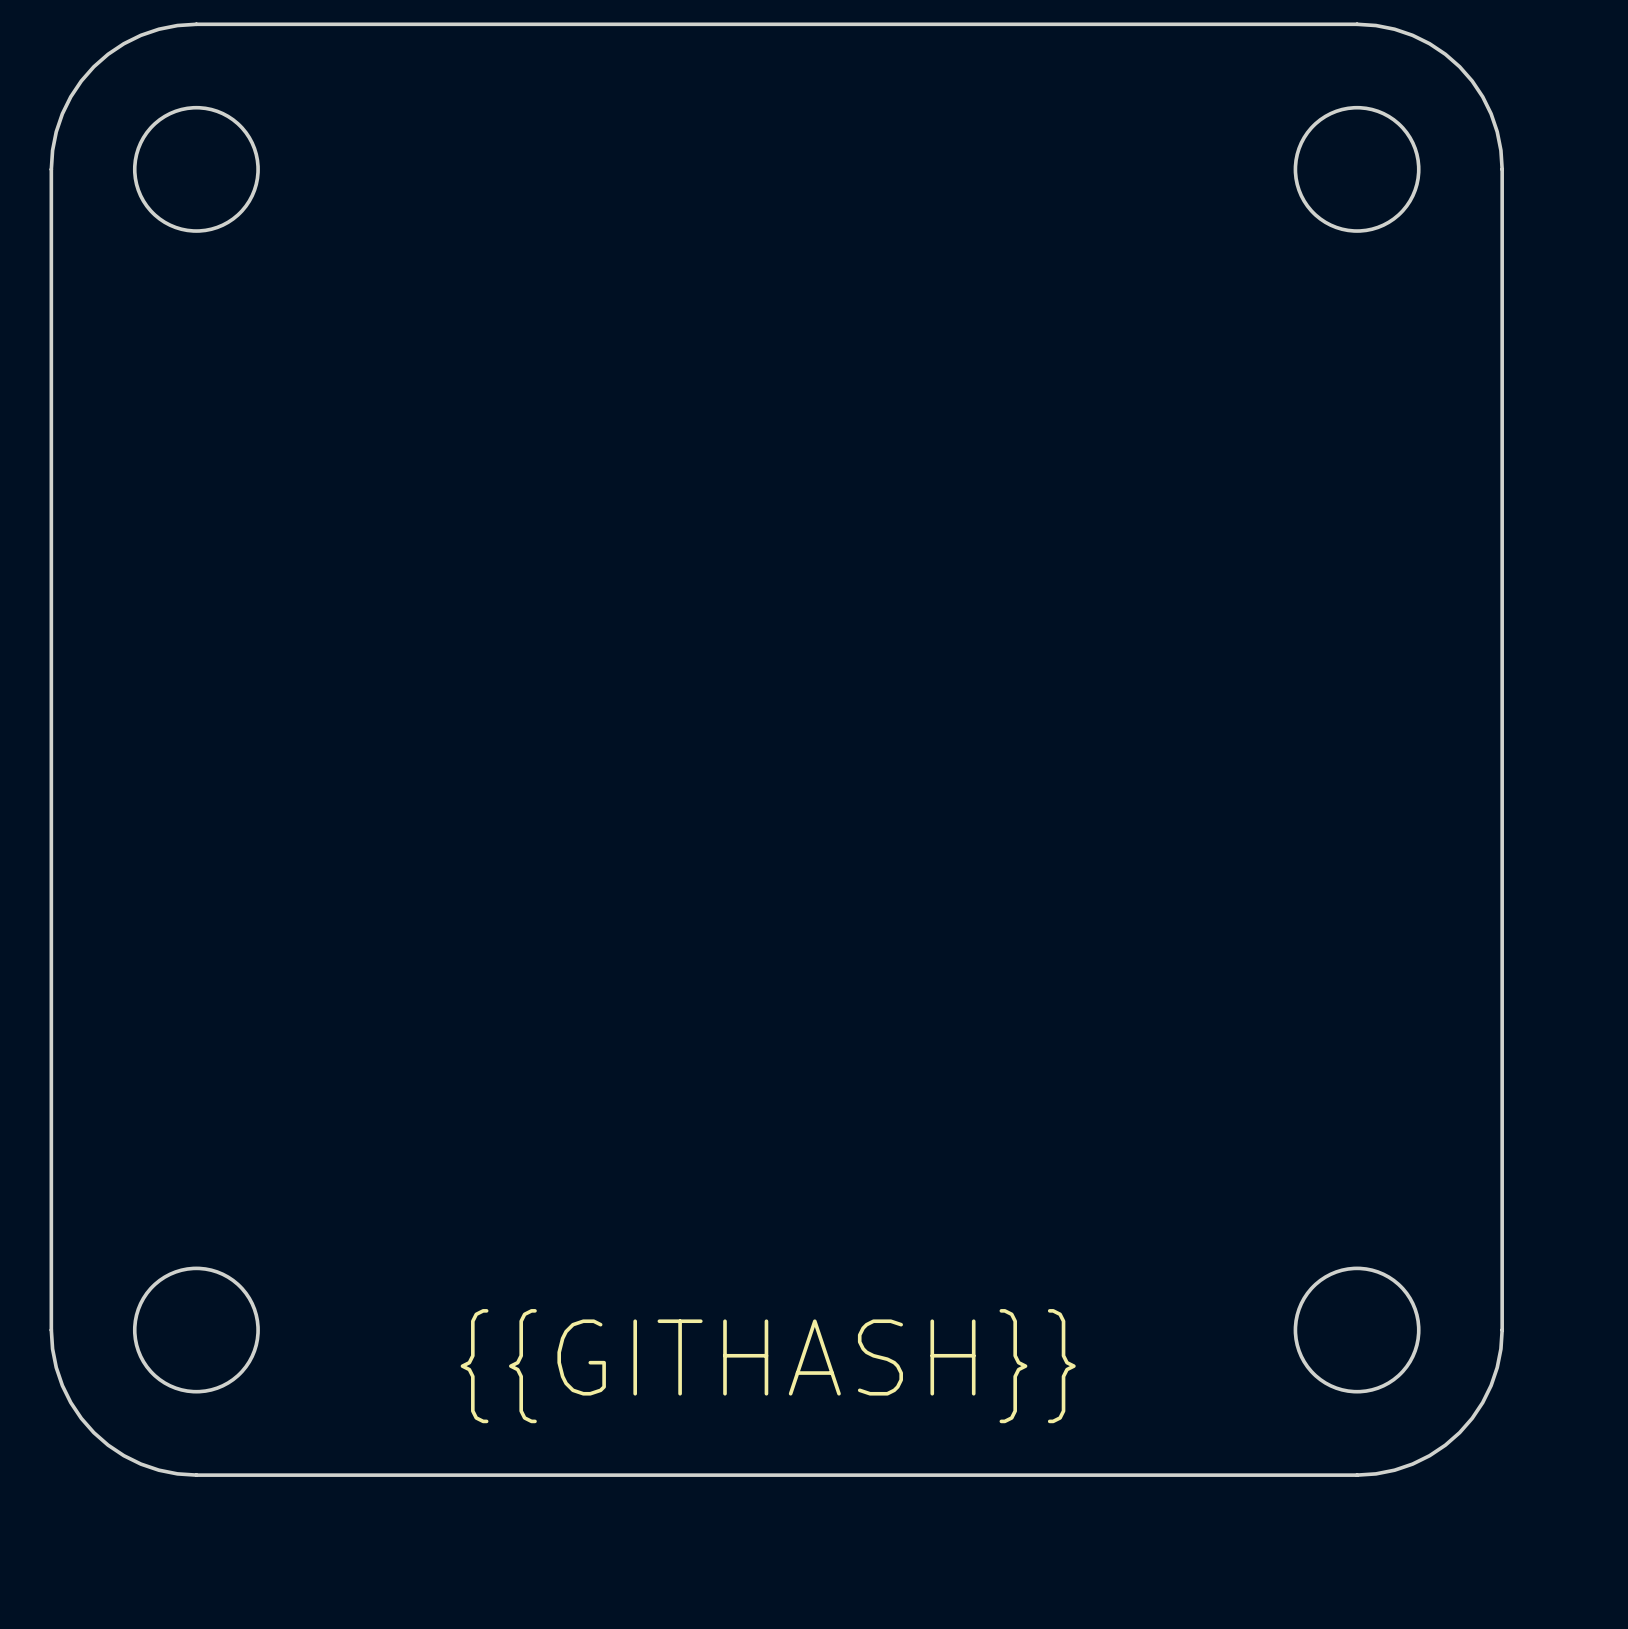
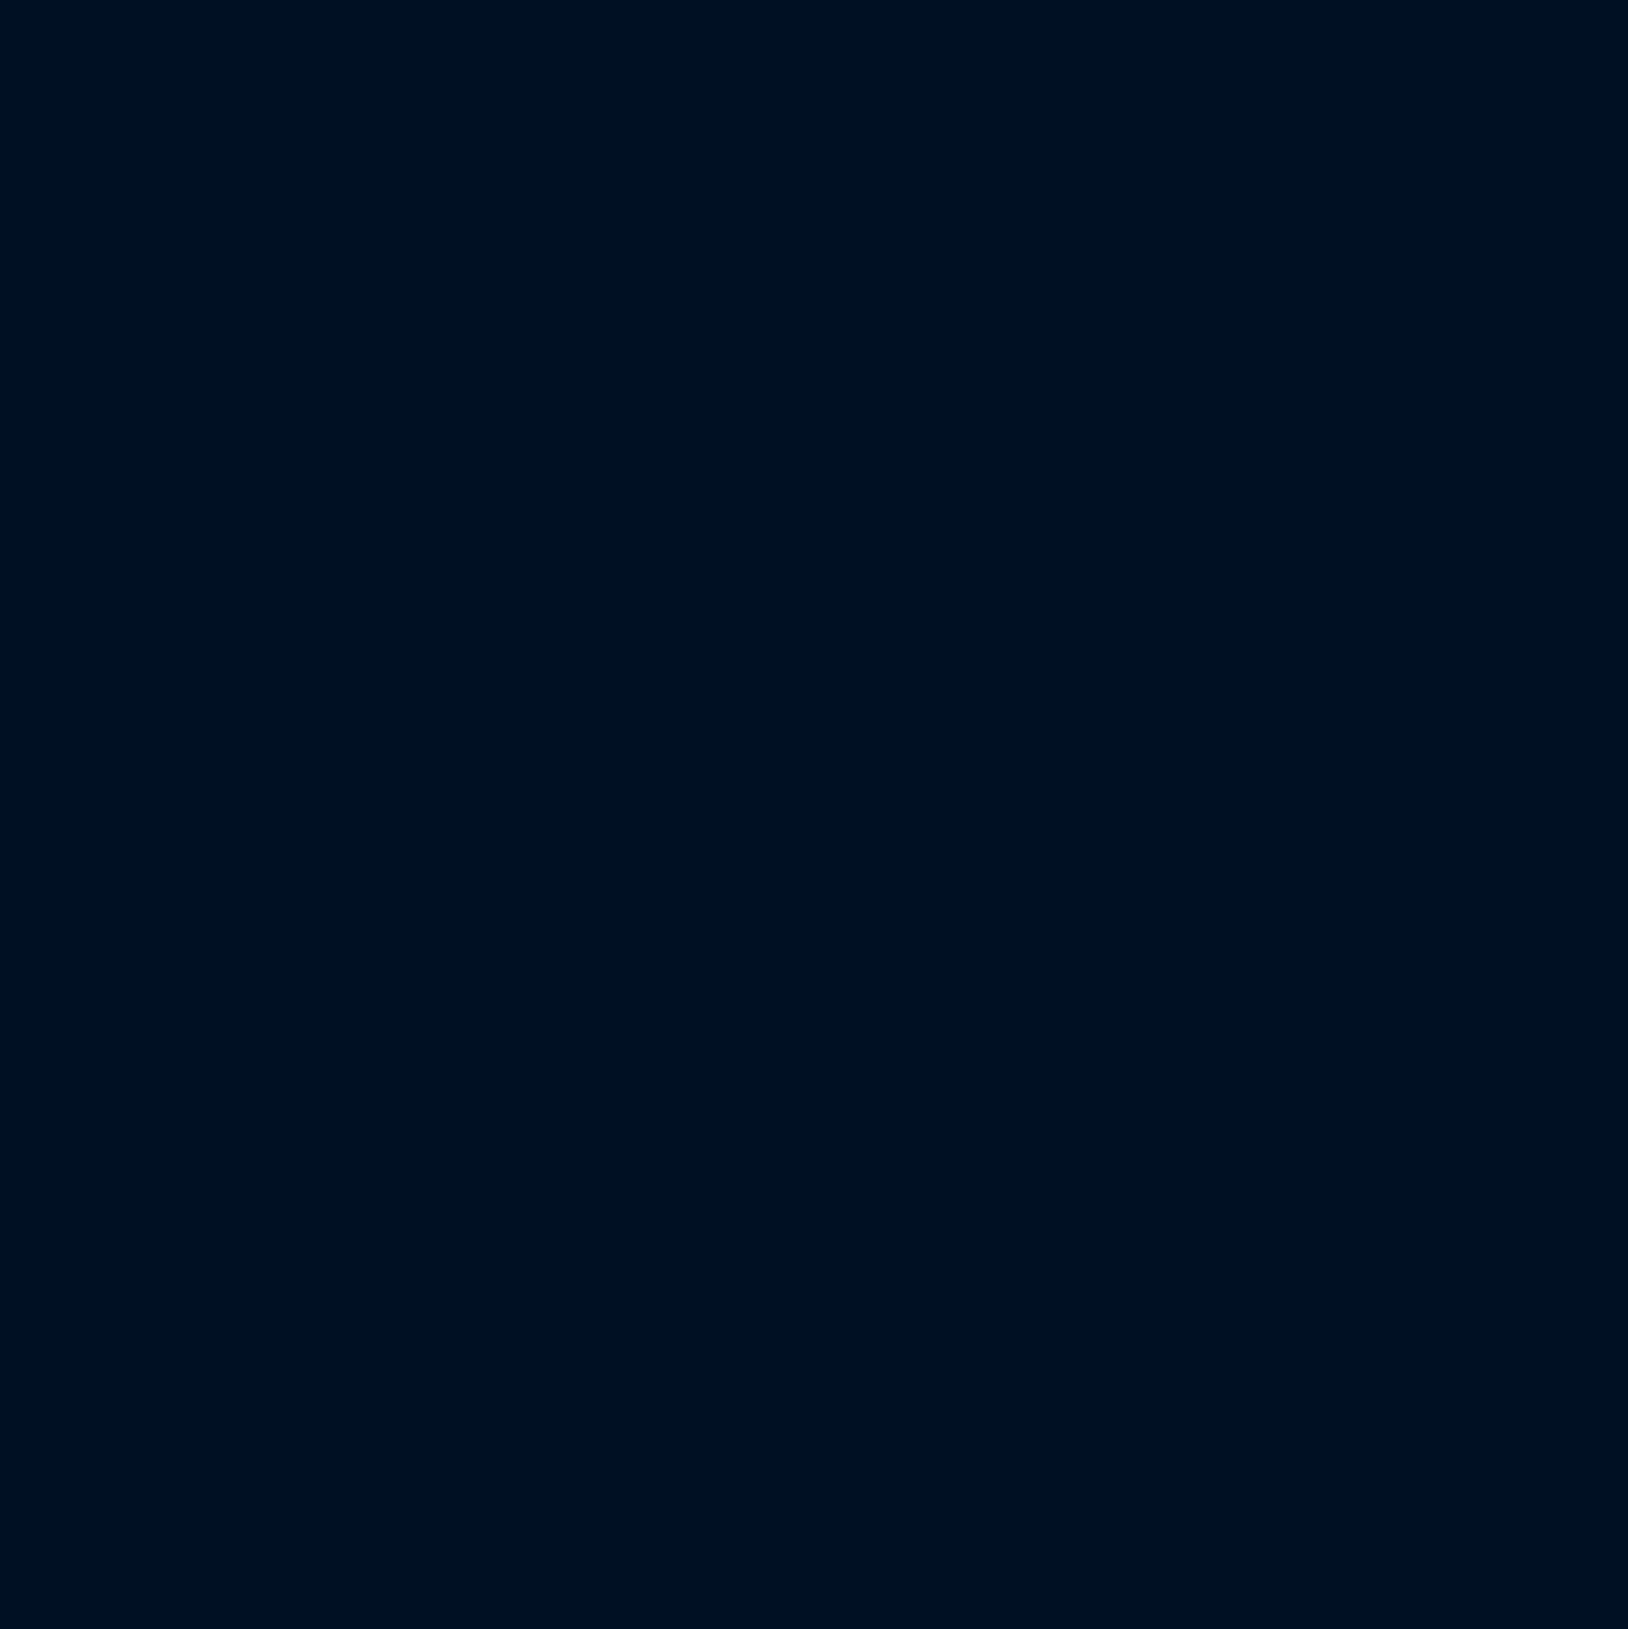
board edge: (196, 24) (1357, 24) (1394, 29) (1412, 35) (1445, 54) (1459, 66) (1472, 81) (1491, 113) (1497, 131) (1502, 169) (1502, 1330) (1500, 1348) (1491, 1385) (1472, 1418) (1459, 1432) (1445, 1445) (1412, 1464) (1394, 1470) (1357, 1475) (196, 1475) (177, 1473) (140, 1464) (108, 1445) (93, 1432) (70, 1402) (62, 1385) (52, 1348) (51, 1330) (52, 150) (62, 113) (70, 96) (93, 66) (108, 54) (140, 35) (158, 29) (196, 24) -> none
round board edge: [132, 105, 260, 233] -> none
round board edge: [1293, 105, 1421, 233] -> none
round board edge: [132, 1266, 260, 1394] -> none
round board edge: [1293, 1266, 1421, 1394] -> none
text: {{GITHASH}} (768, 1366) -> none

